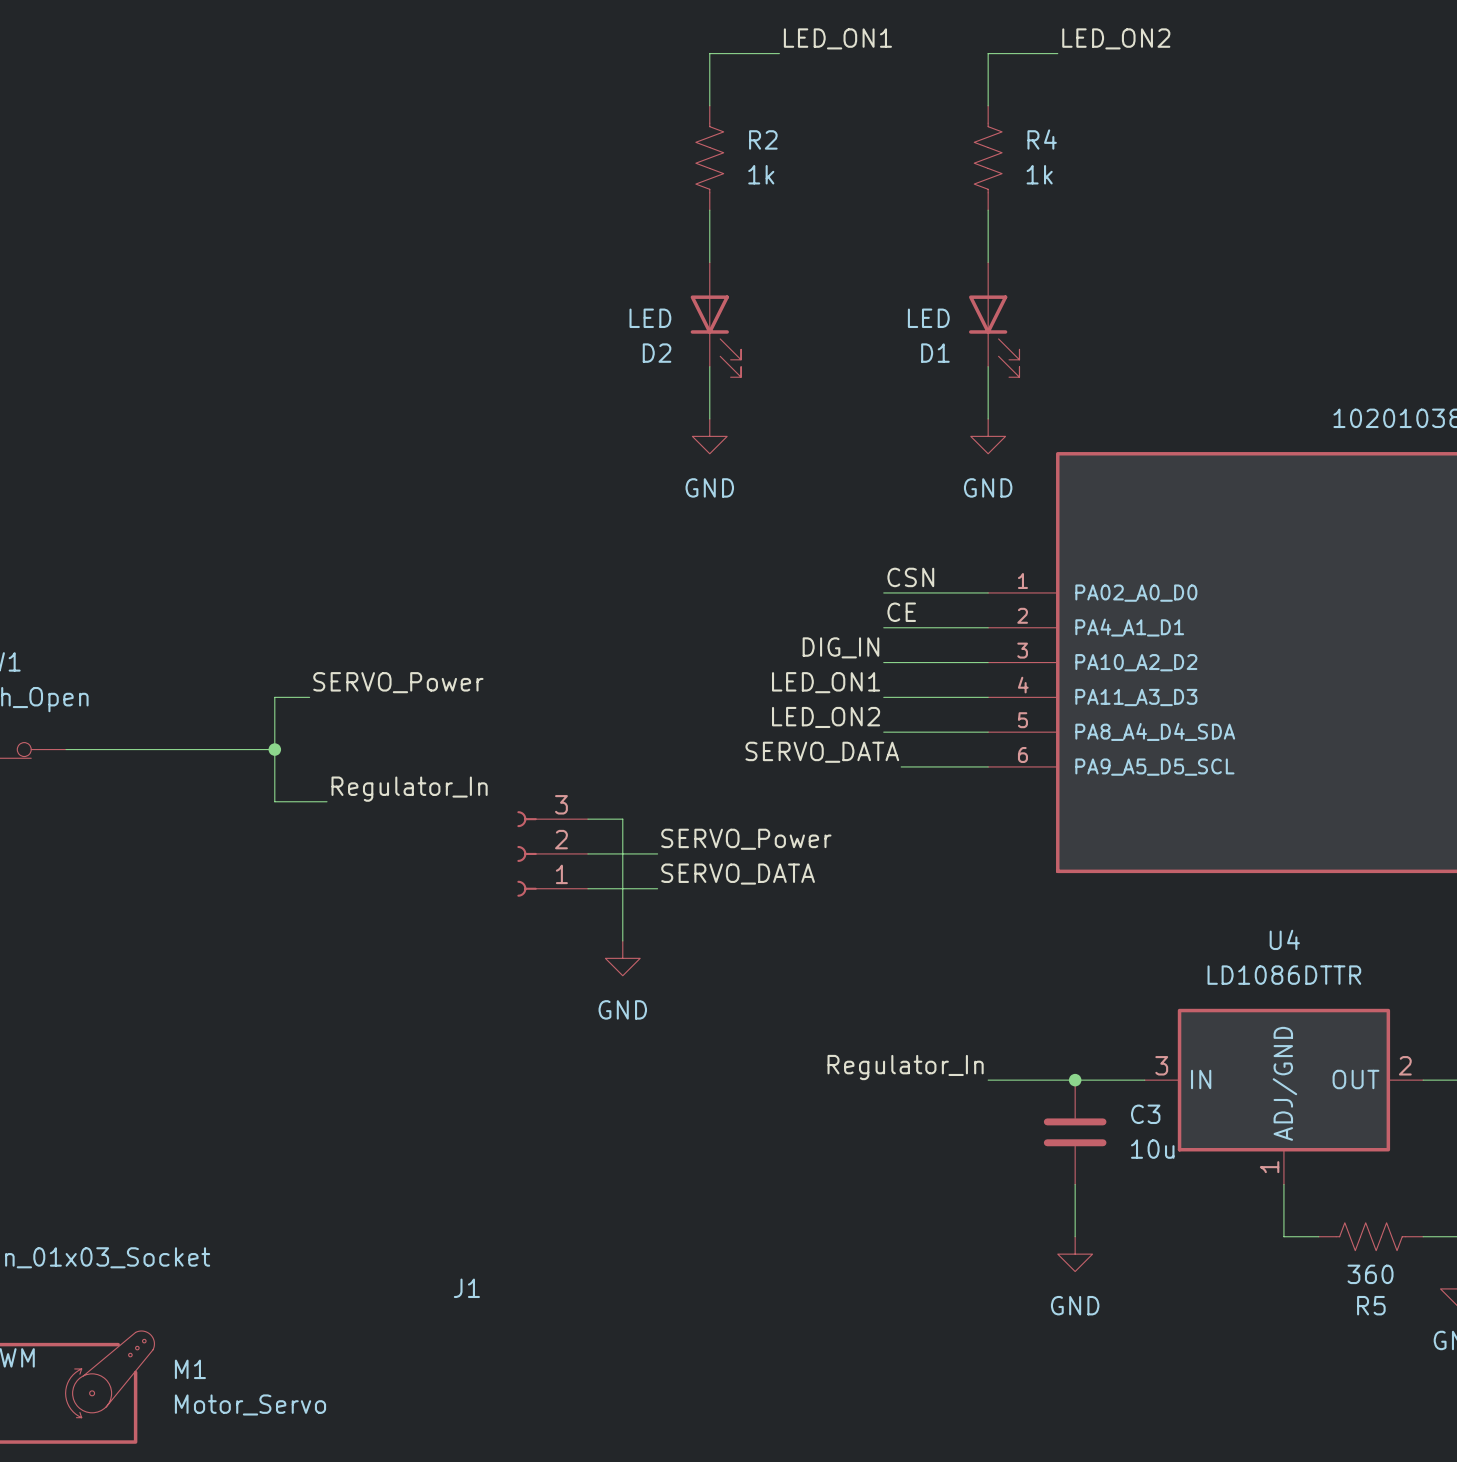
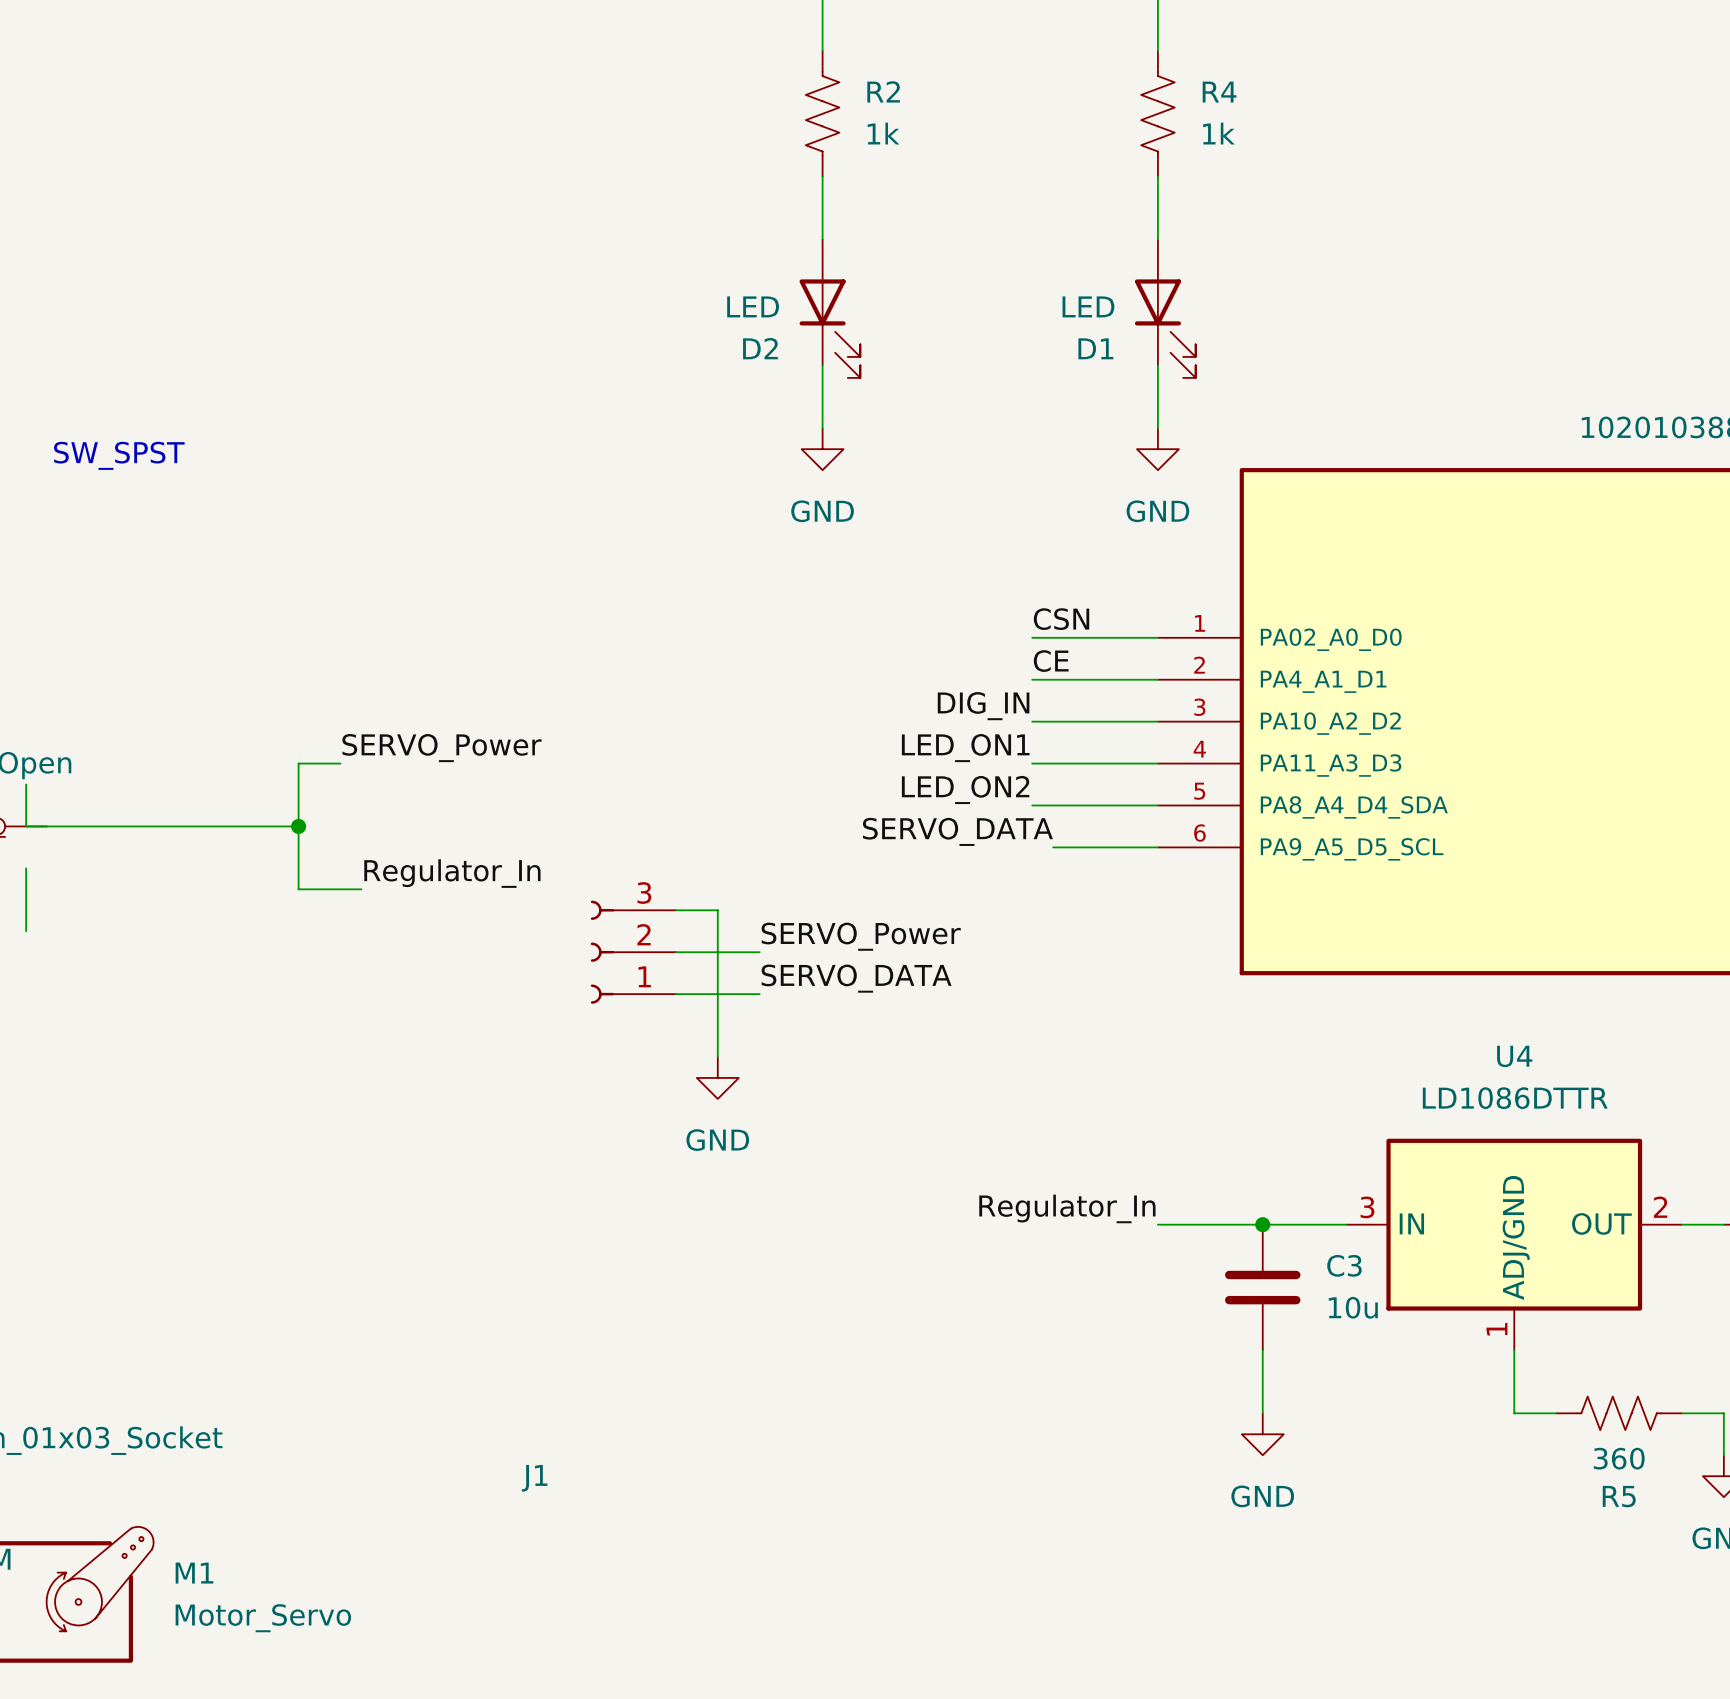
text: none -> SW_SPST (119, 455)
wire: none -> (26, 784) (26, 826) (47, 826)
wire: none -> (26, 868) (26, 931)

